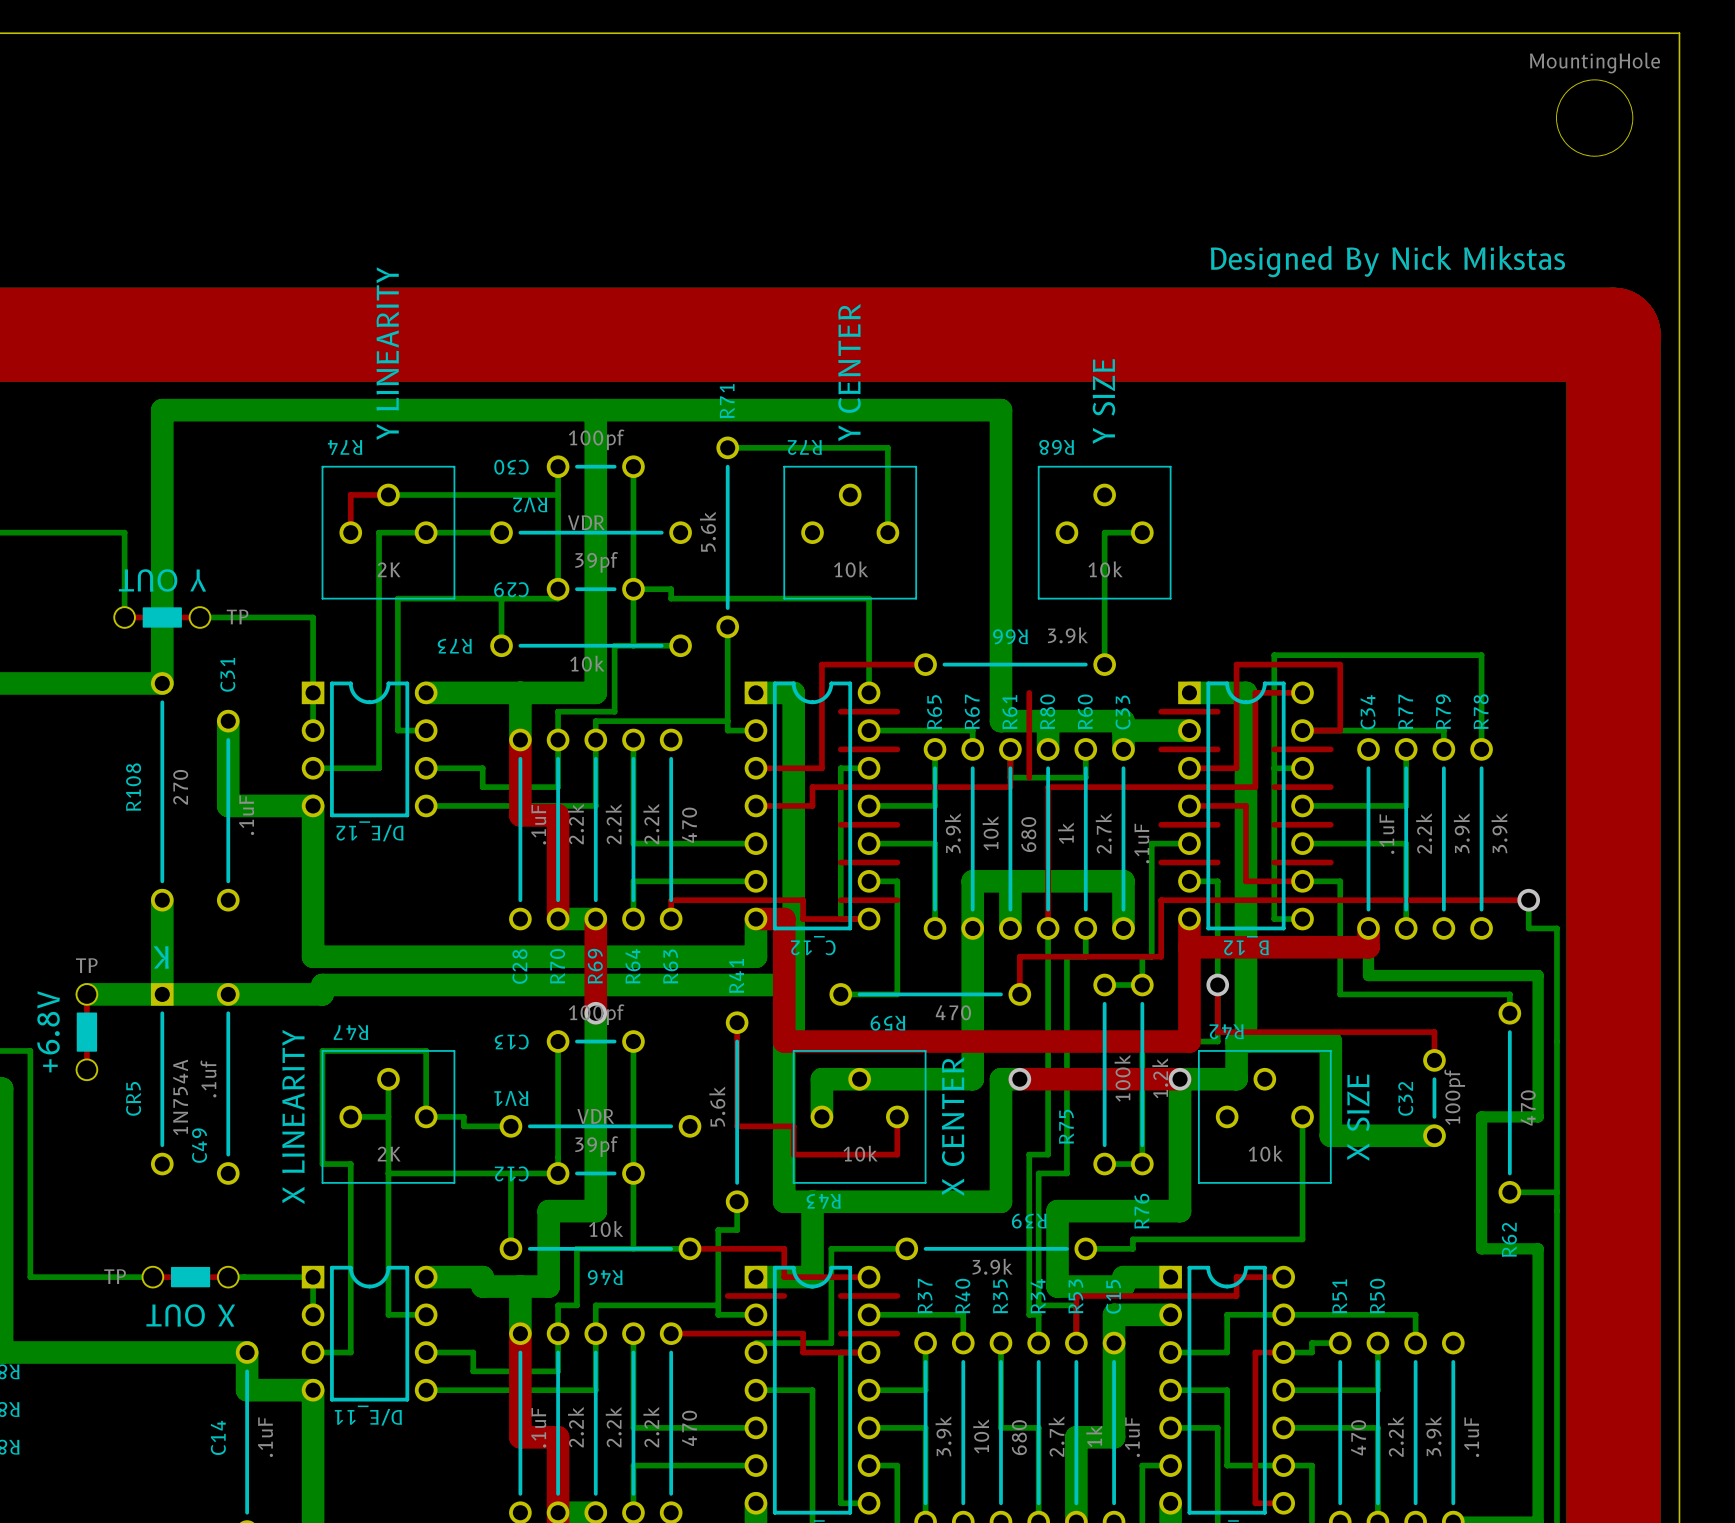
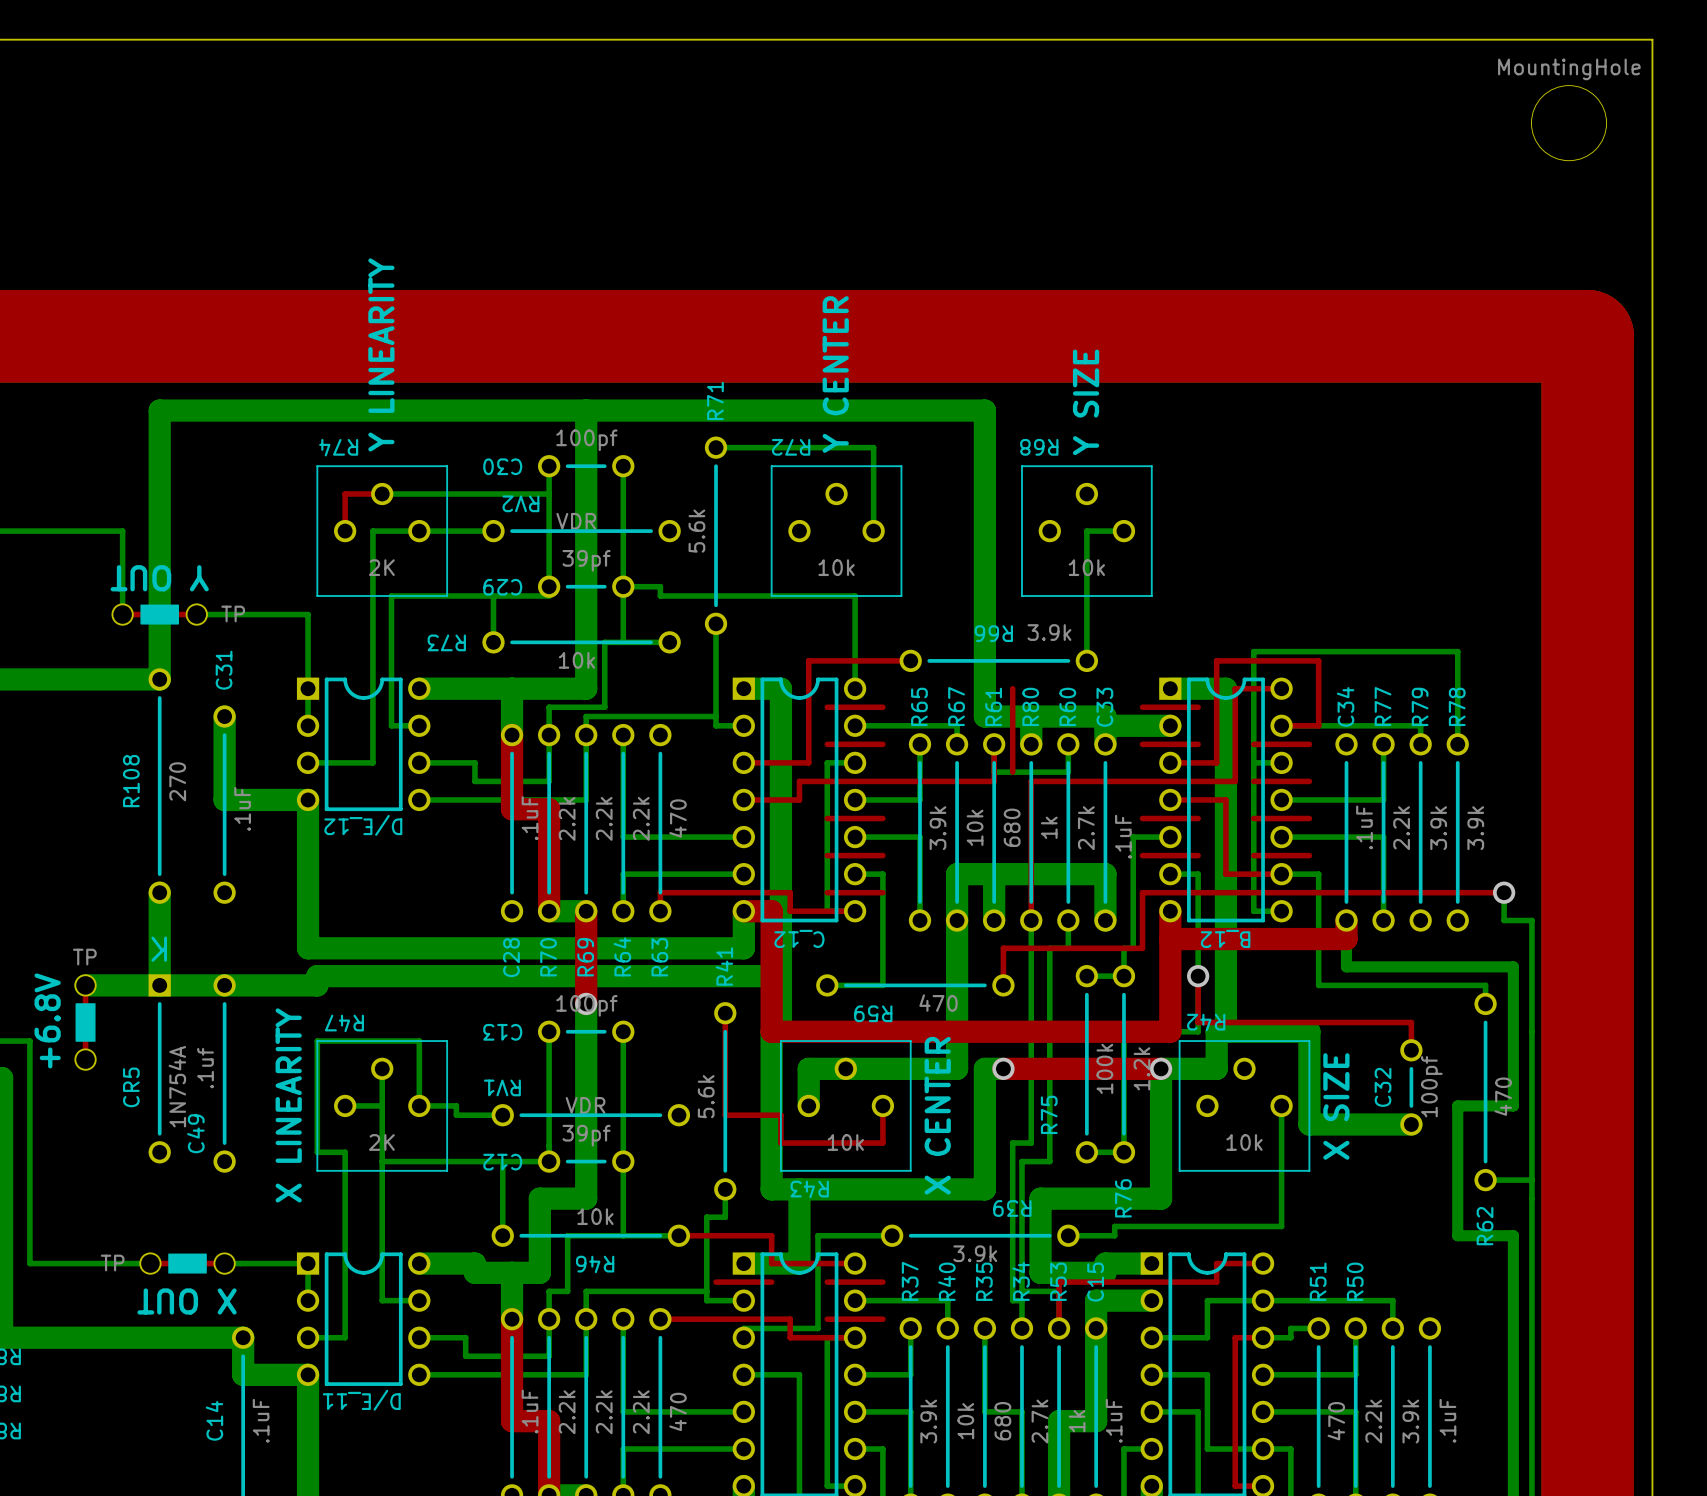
text: Designed By Nick Mikstas (1387, 261) -> none

